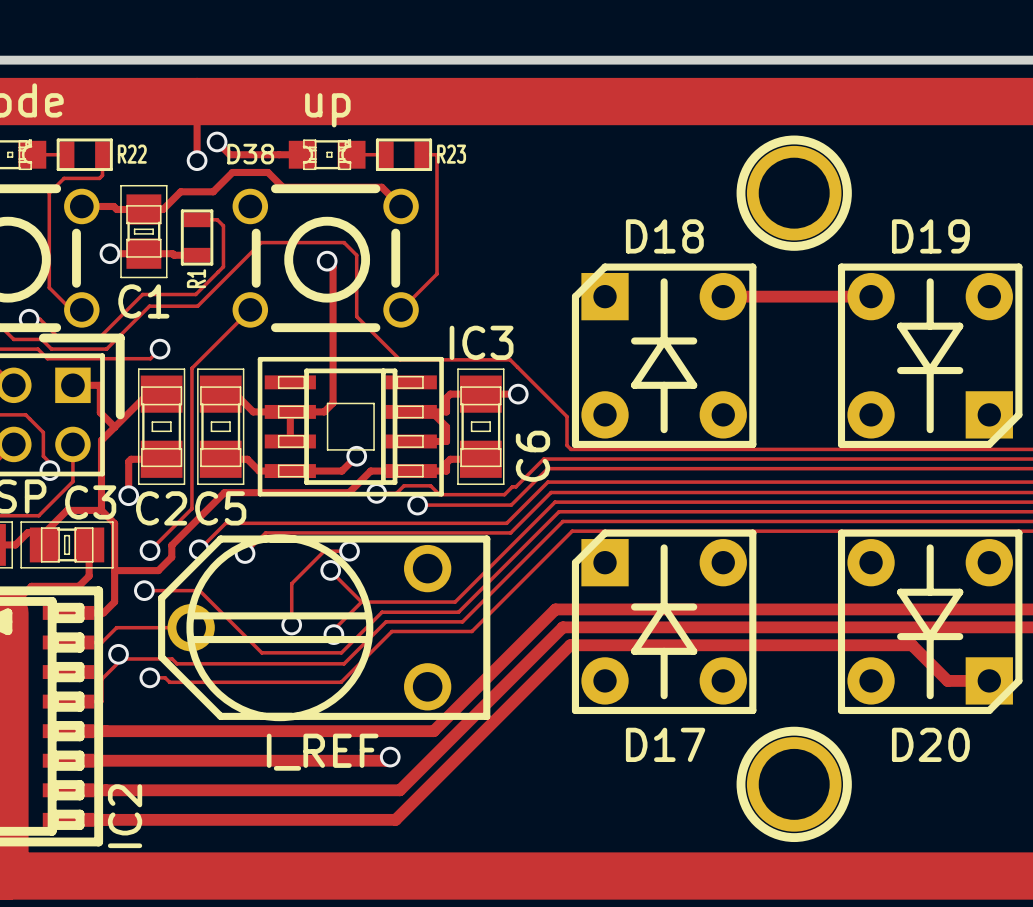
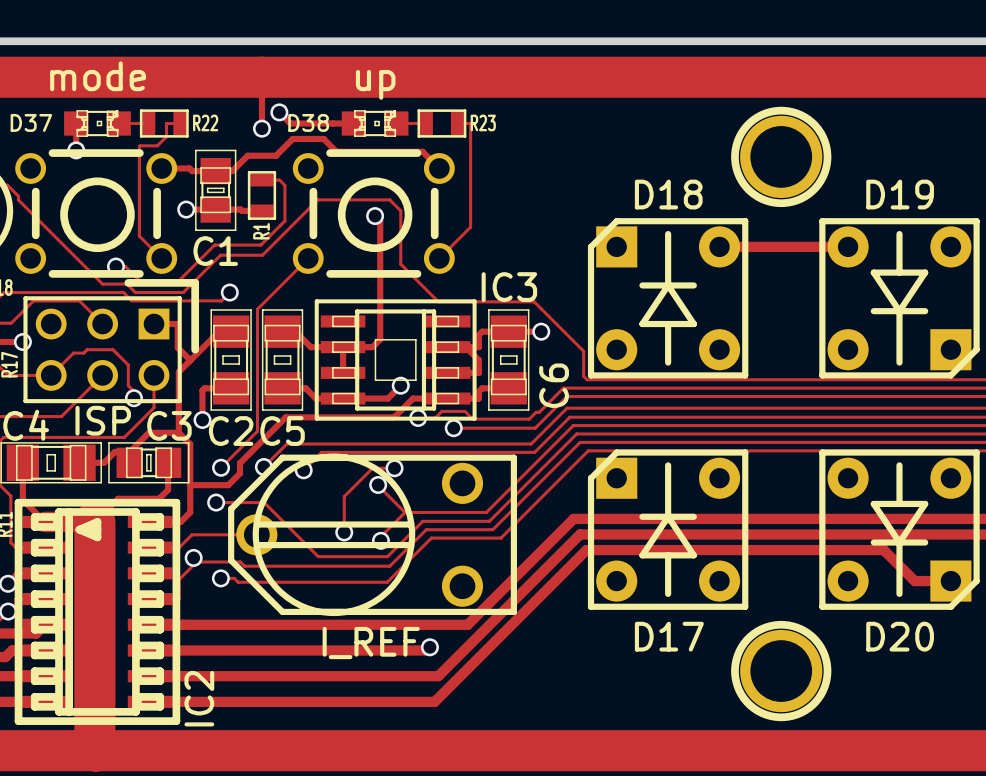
track: (102, 154) (102, 175) (99, 178) (64, 178) (49, 193) (49, 287) (71, 309) (81, 309) -> (179, 123) (166, 123) (166, 136) (157, 145) (139, 146) (139, 236) (161, 258)

